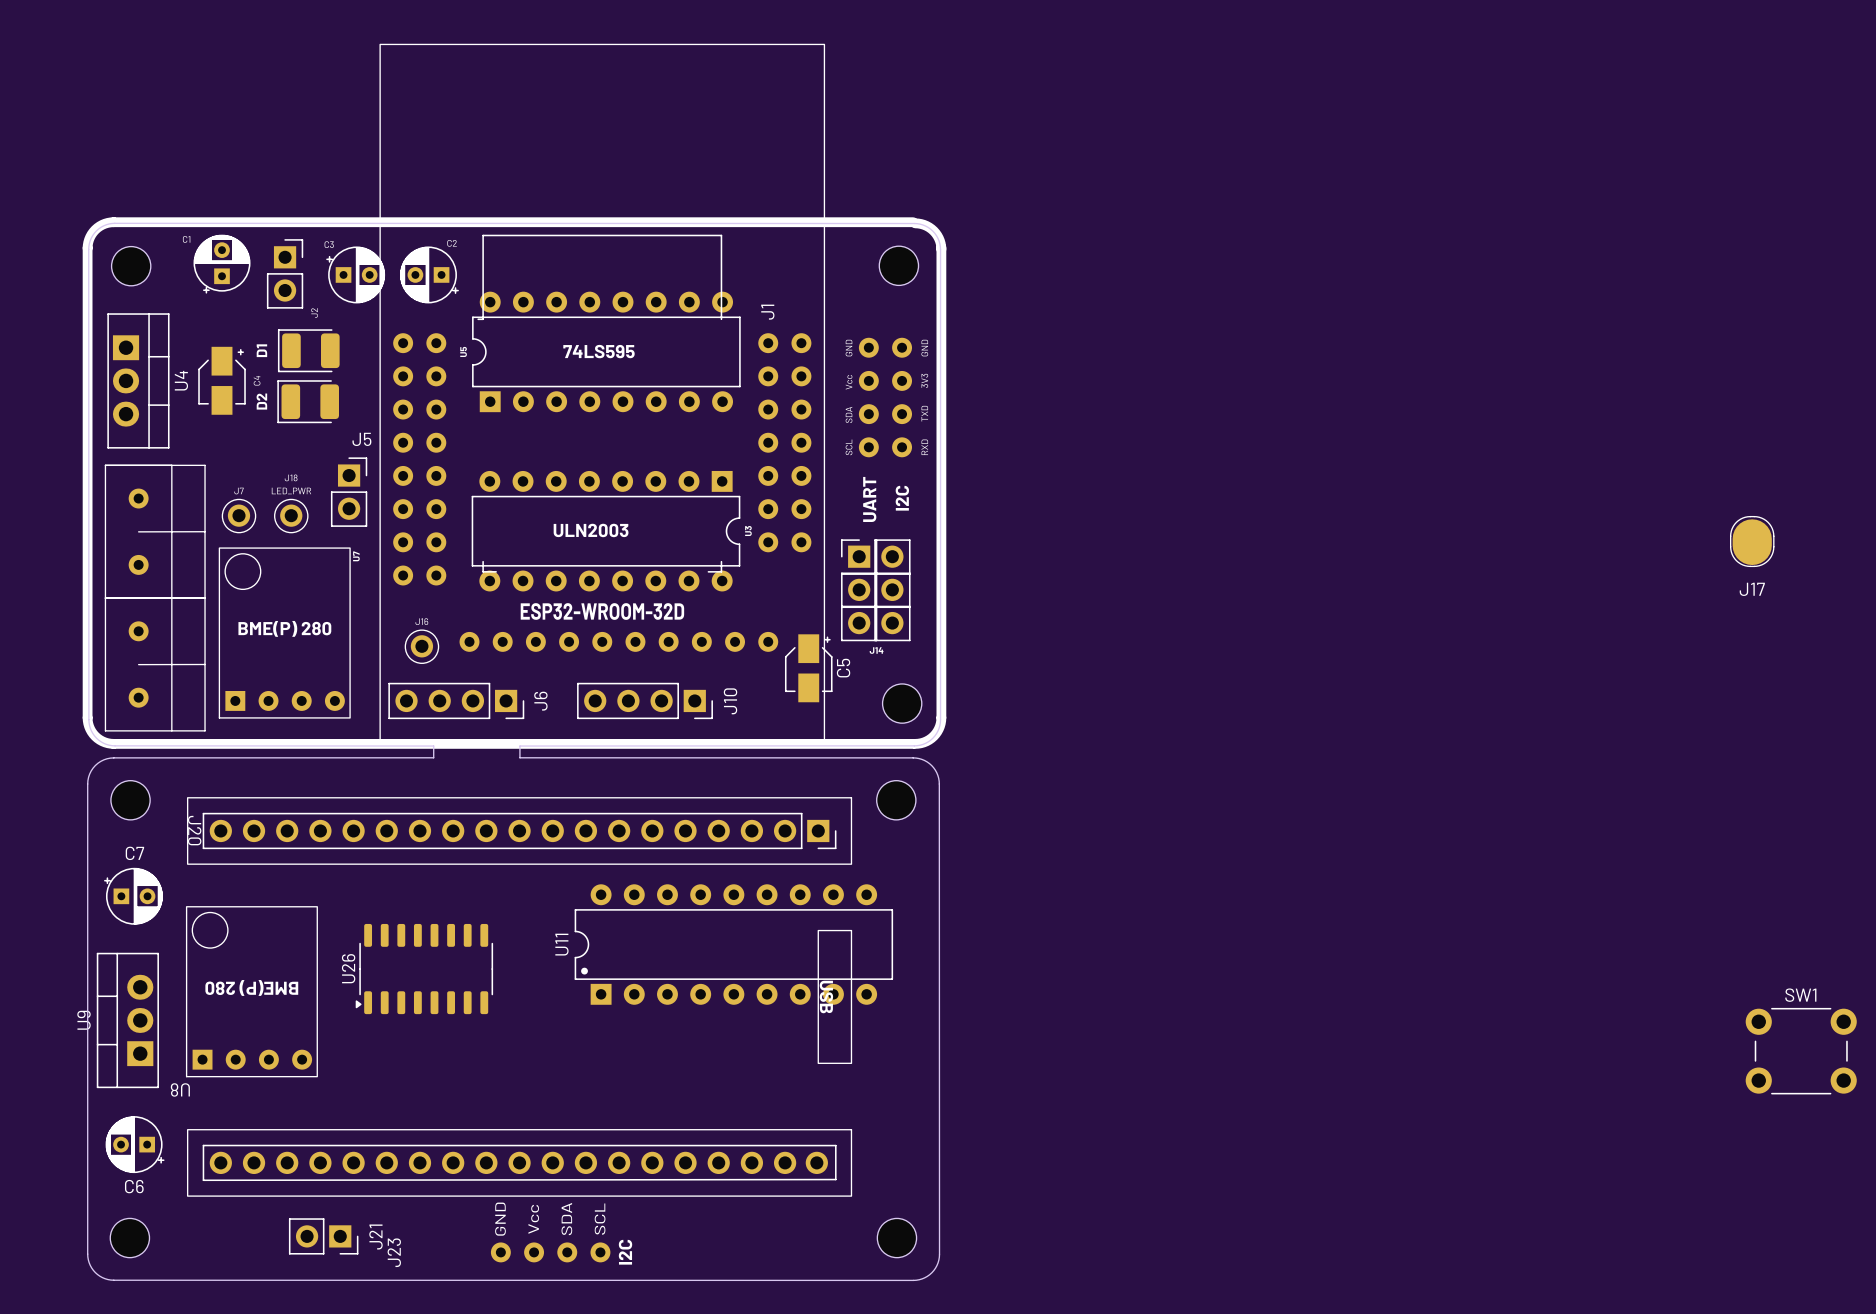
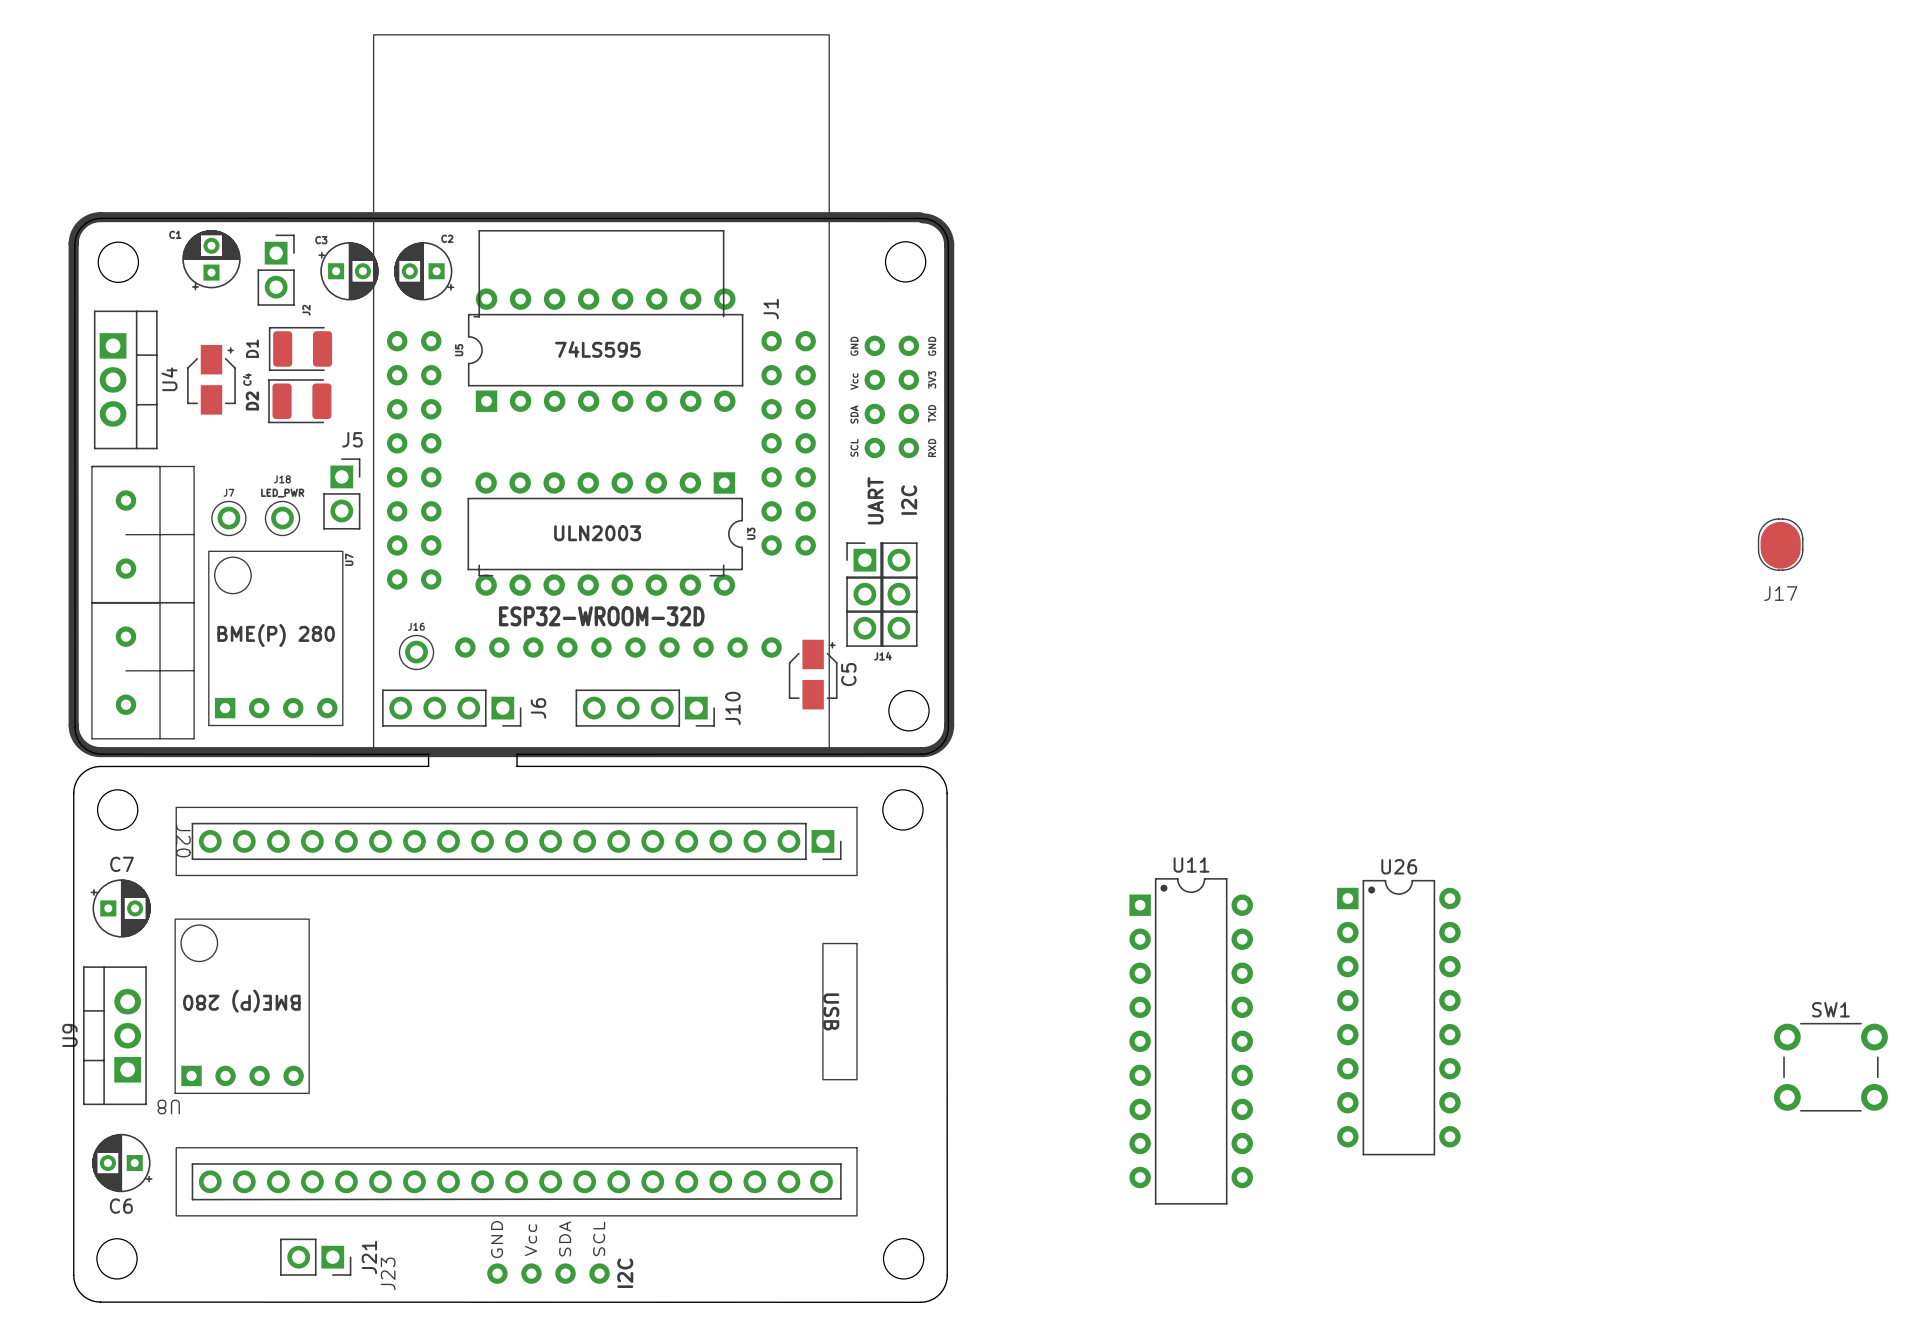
U26 footprint: [355, 923, 494, 1015] -> [1337, 879, 1461, 1156]
U11 rotation: 0° (733, 944) -> 90° clockwise (1191, 1041)
U11 position: (733, 944) -> (1191, 1041)
U26 name position: U26 (348, 968) -> U26 (1399, 866)

